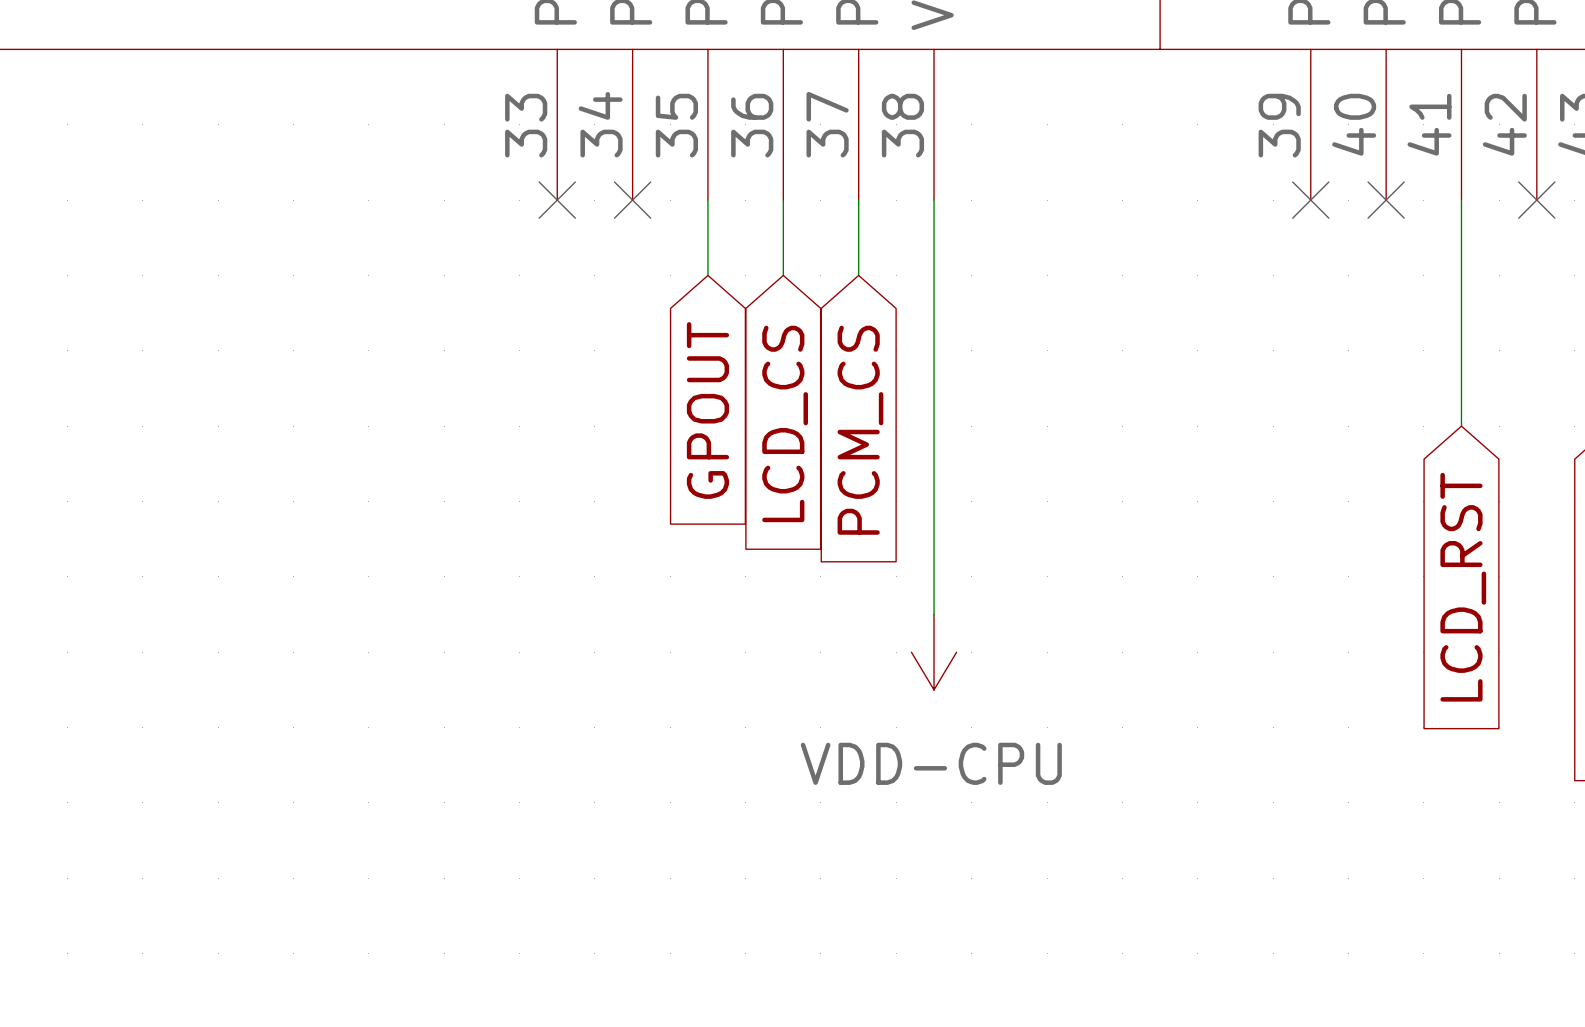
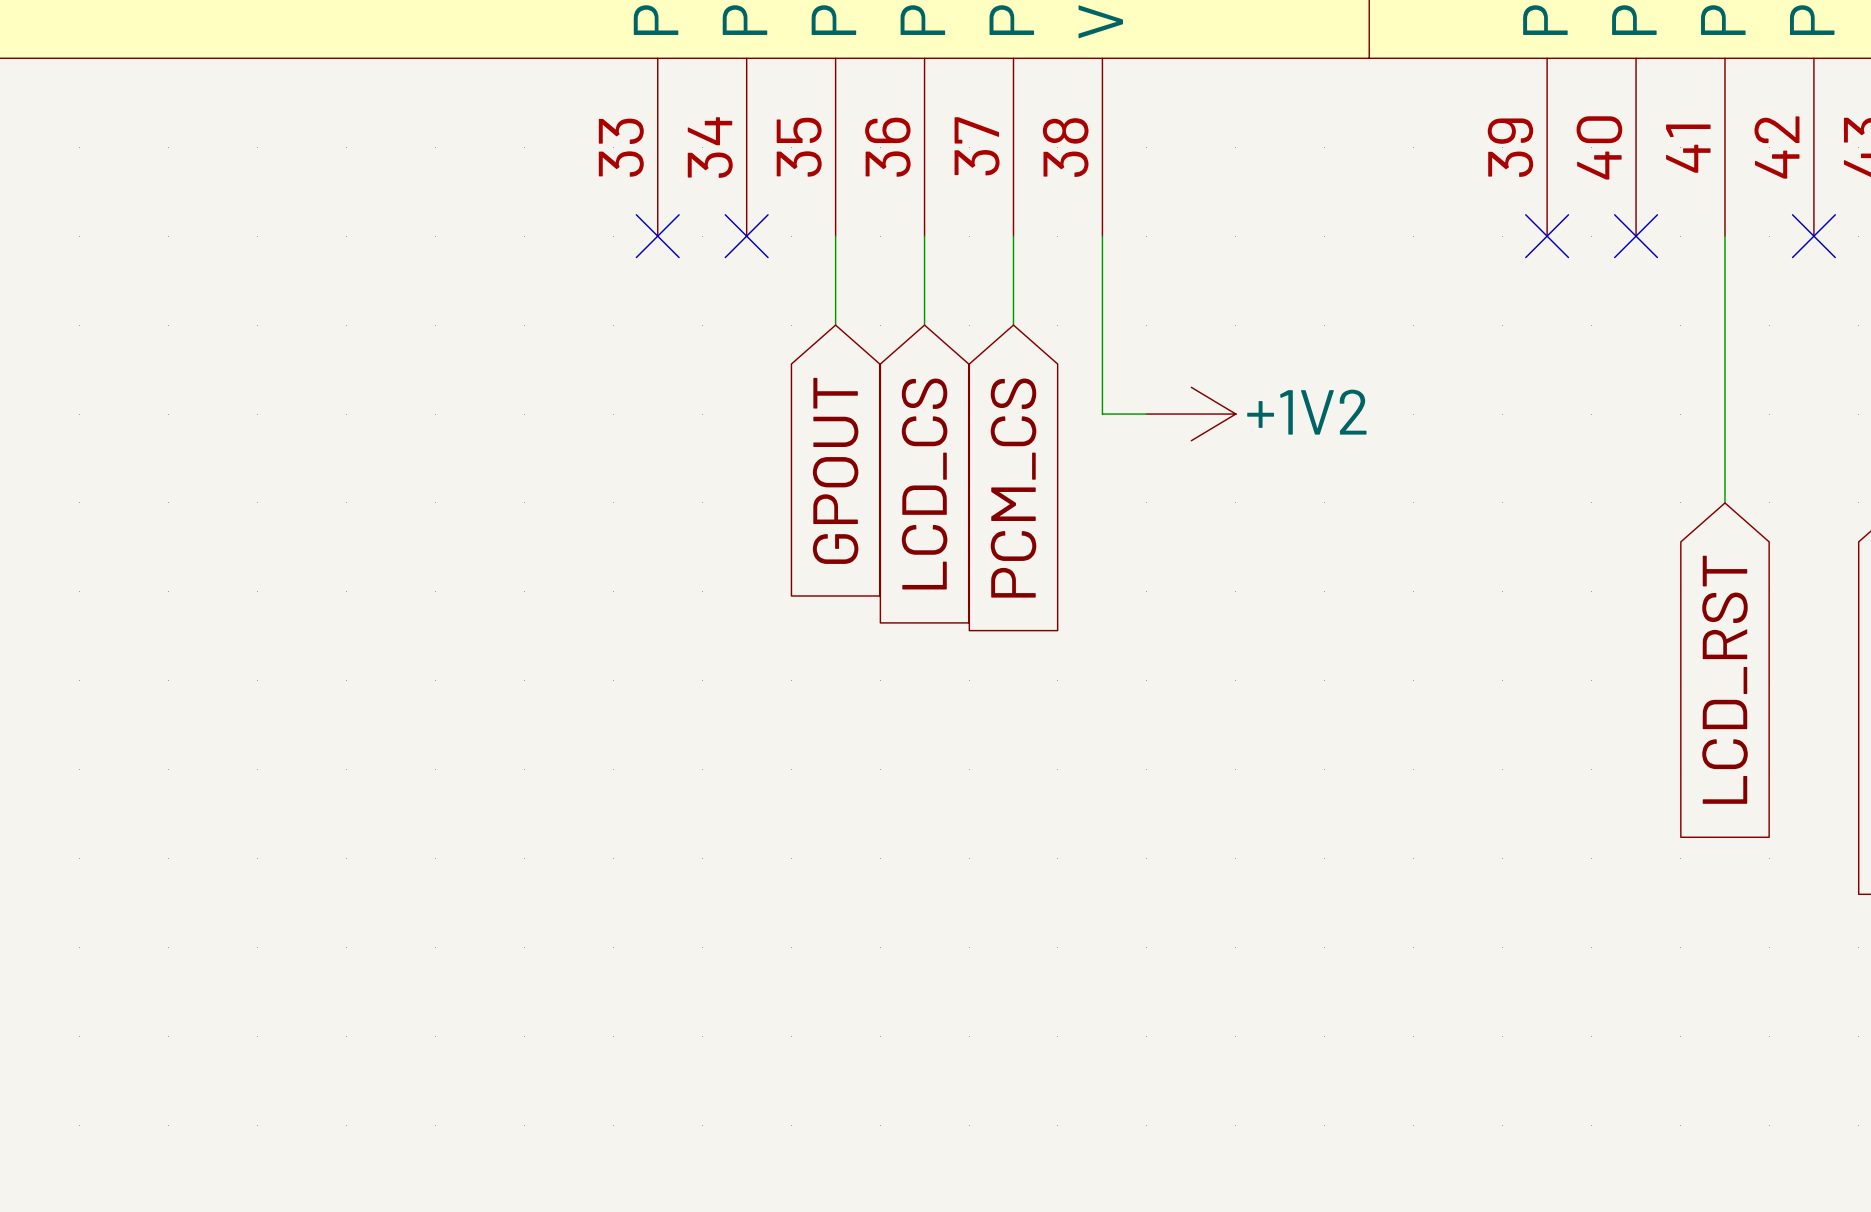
wire: (934, 350) (934, 614) -> (1102, 414) (1146, 414)
power symbol: none -> +1V2 (1191, 414)
power symbol: VDD-CPU (934, 652) -> none

